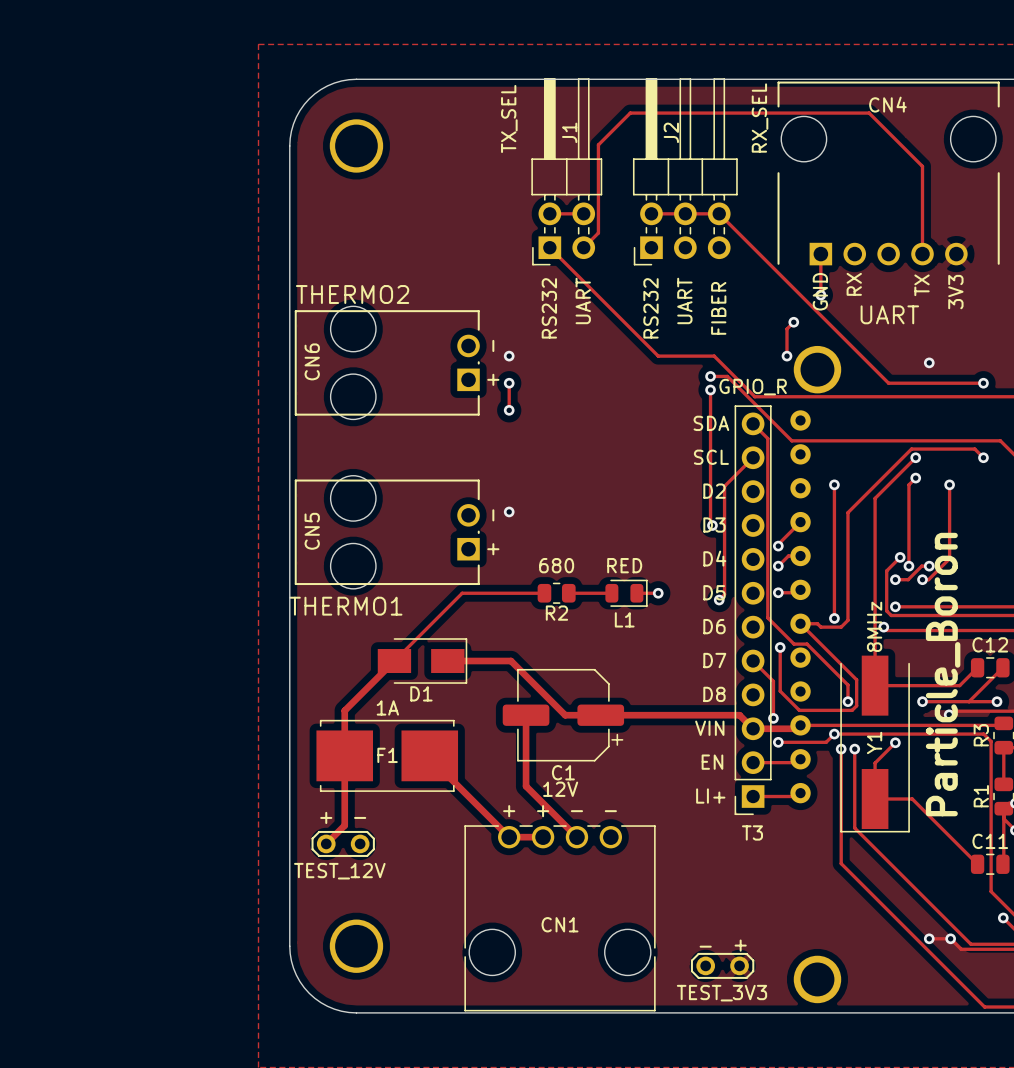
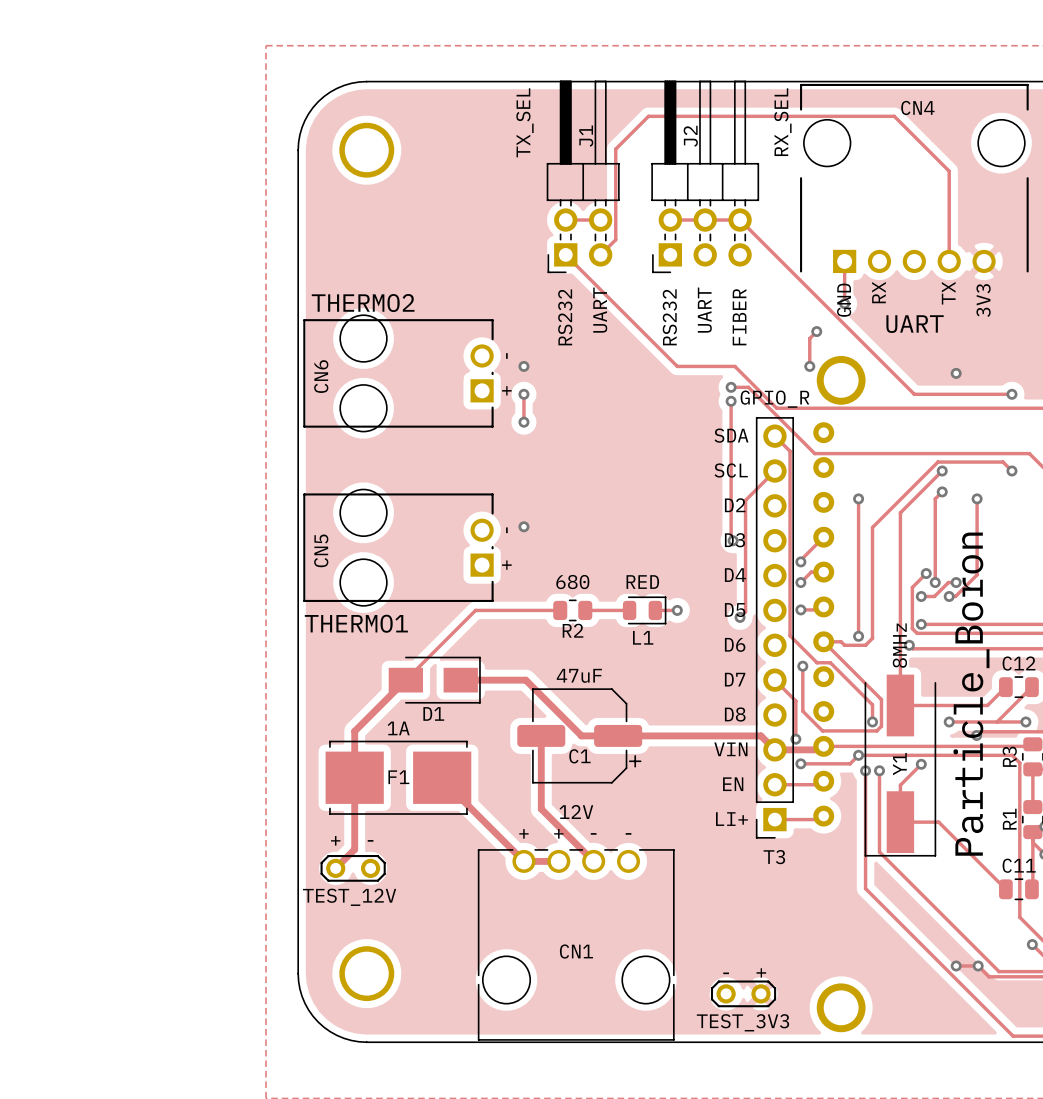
C1 value: none -> 47uF (579, 675)
C1 name position: C1 (563, 772) -> C1 (579, 756)

